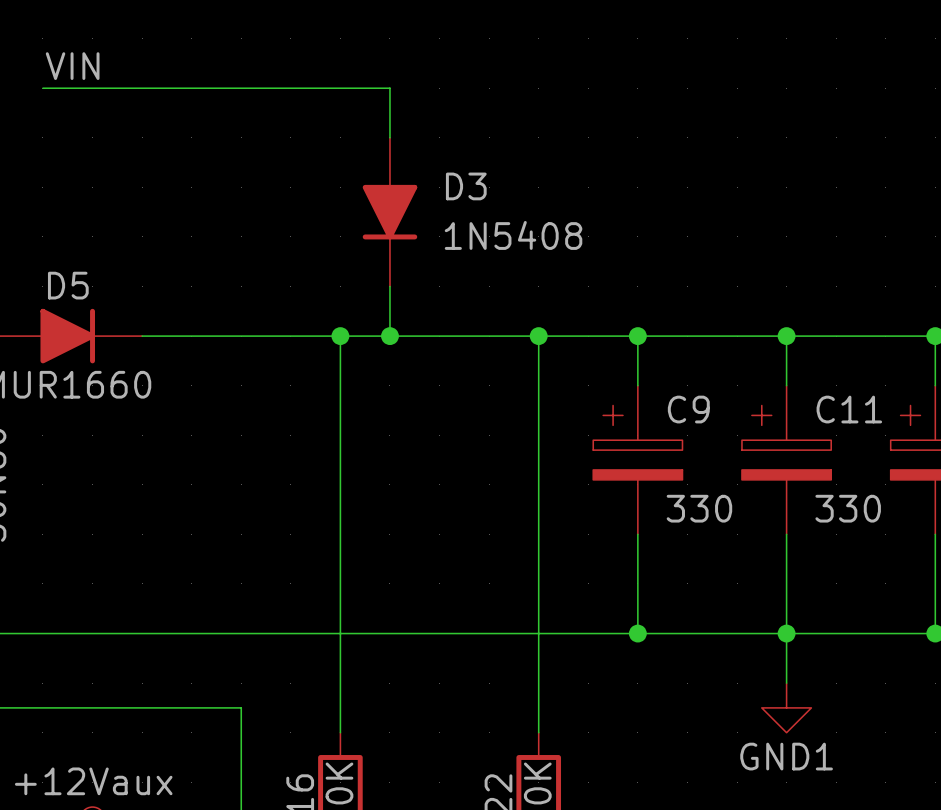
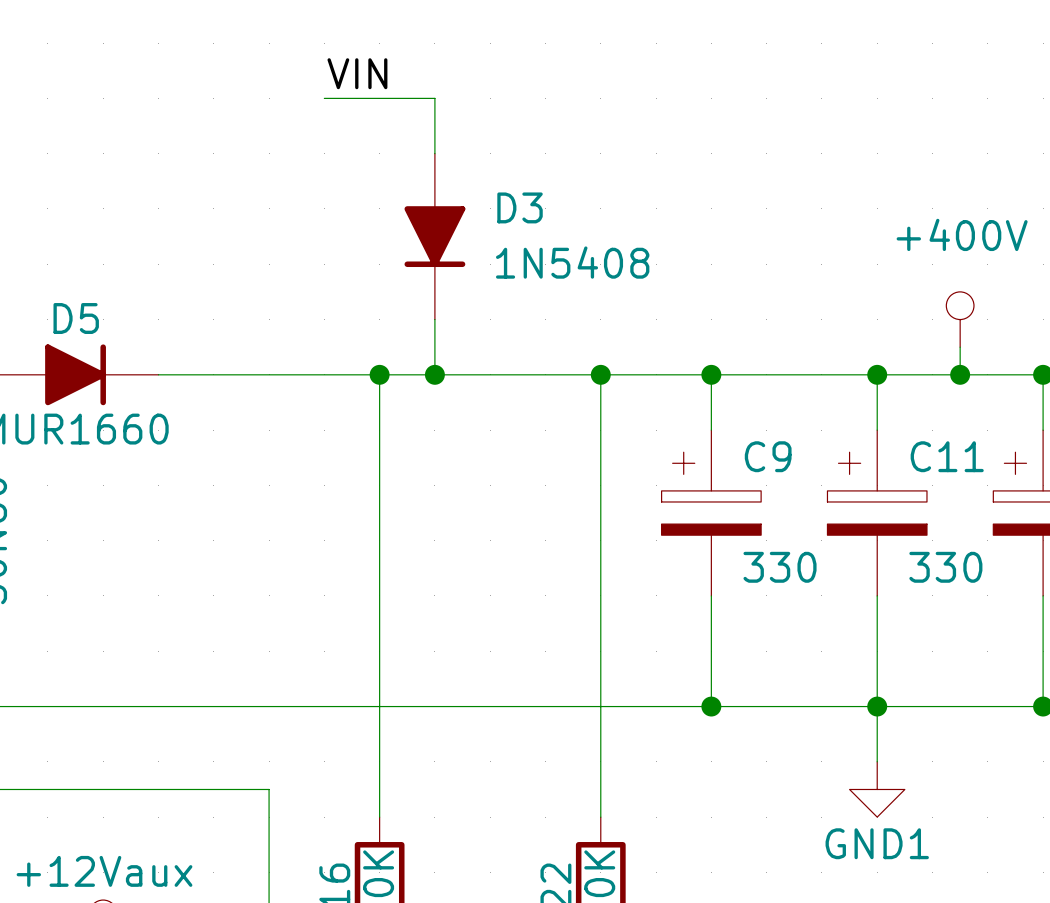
label position: VIN (72, 66) -> VIN (357, 73)
wire: (42, 88) (290, 88) -> none
power symbol: none -> +400V (960, 319)
wire: none -> (960, 347) (960, 374)
junction: none -> (960, 374)

